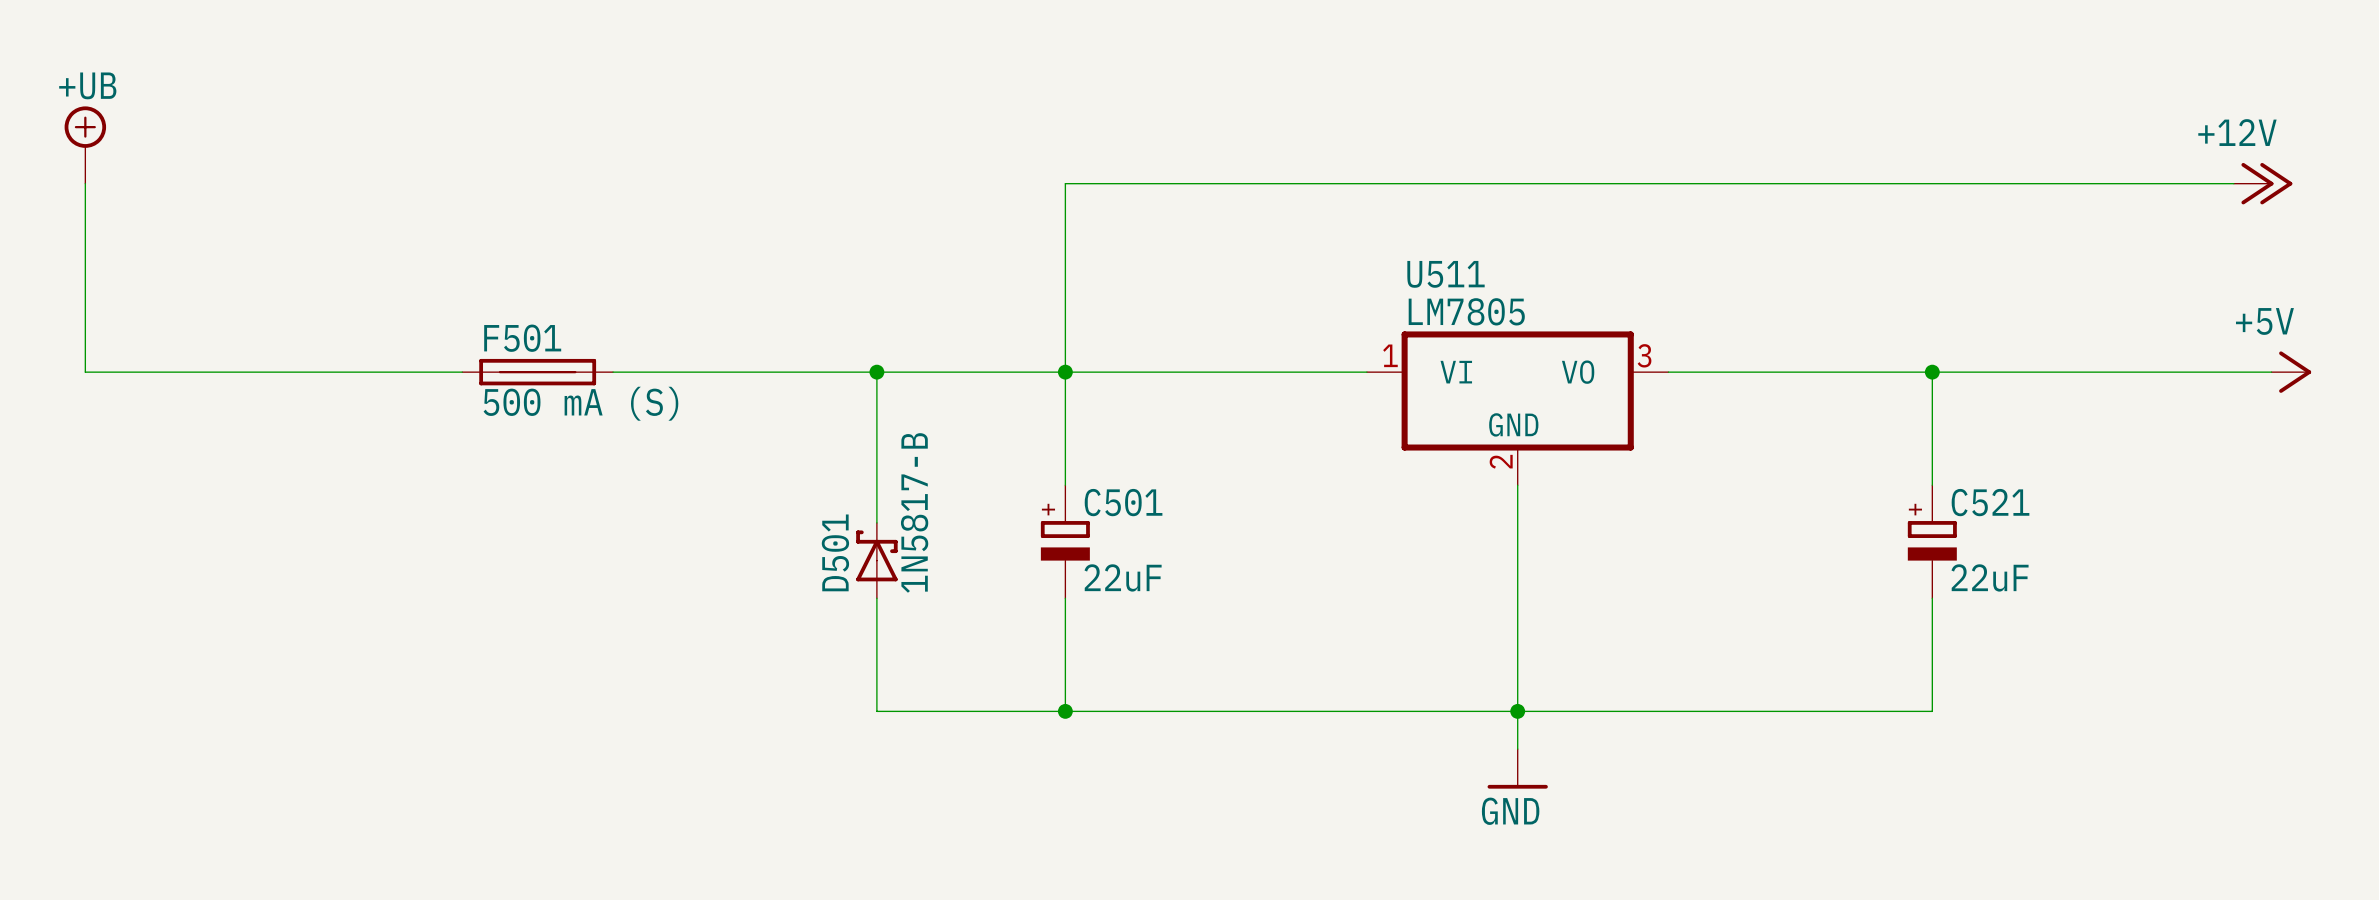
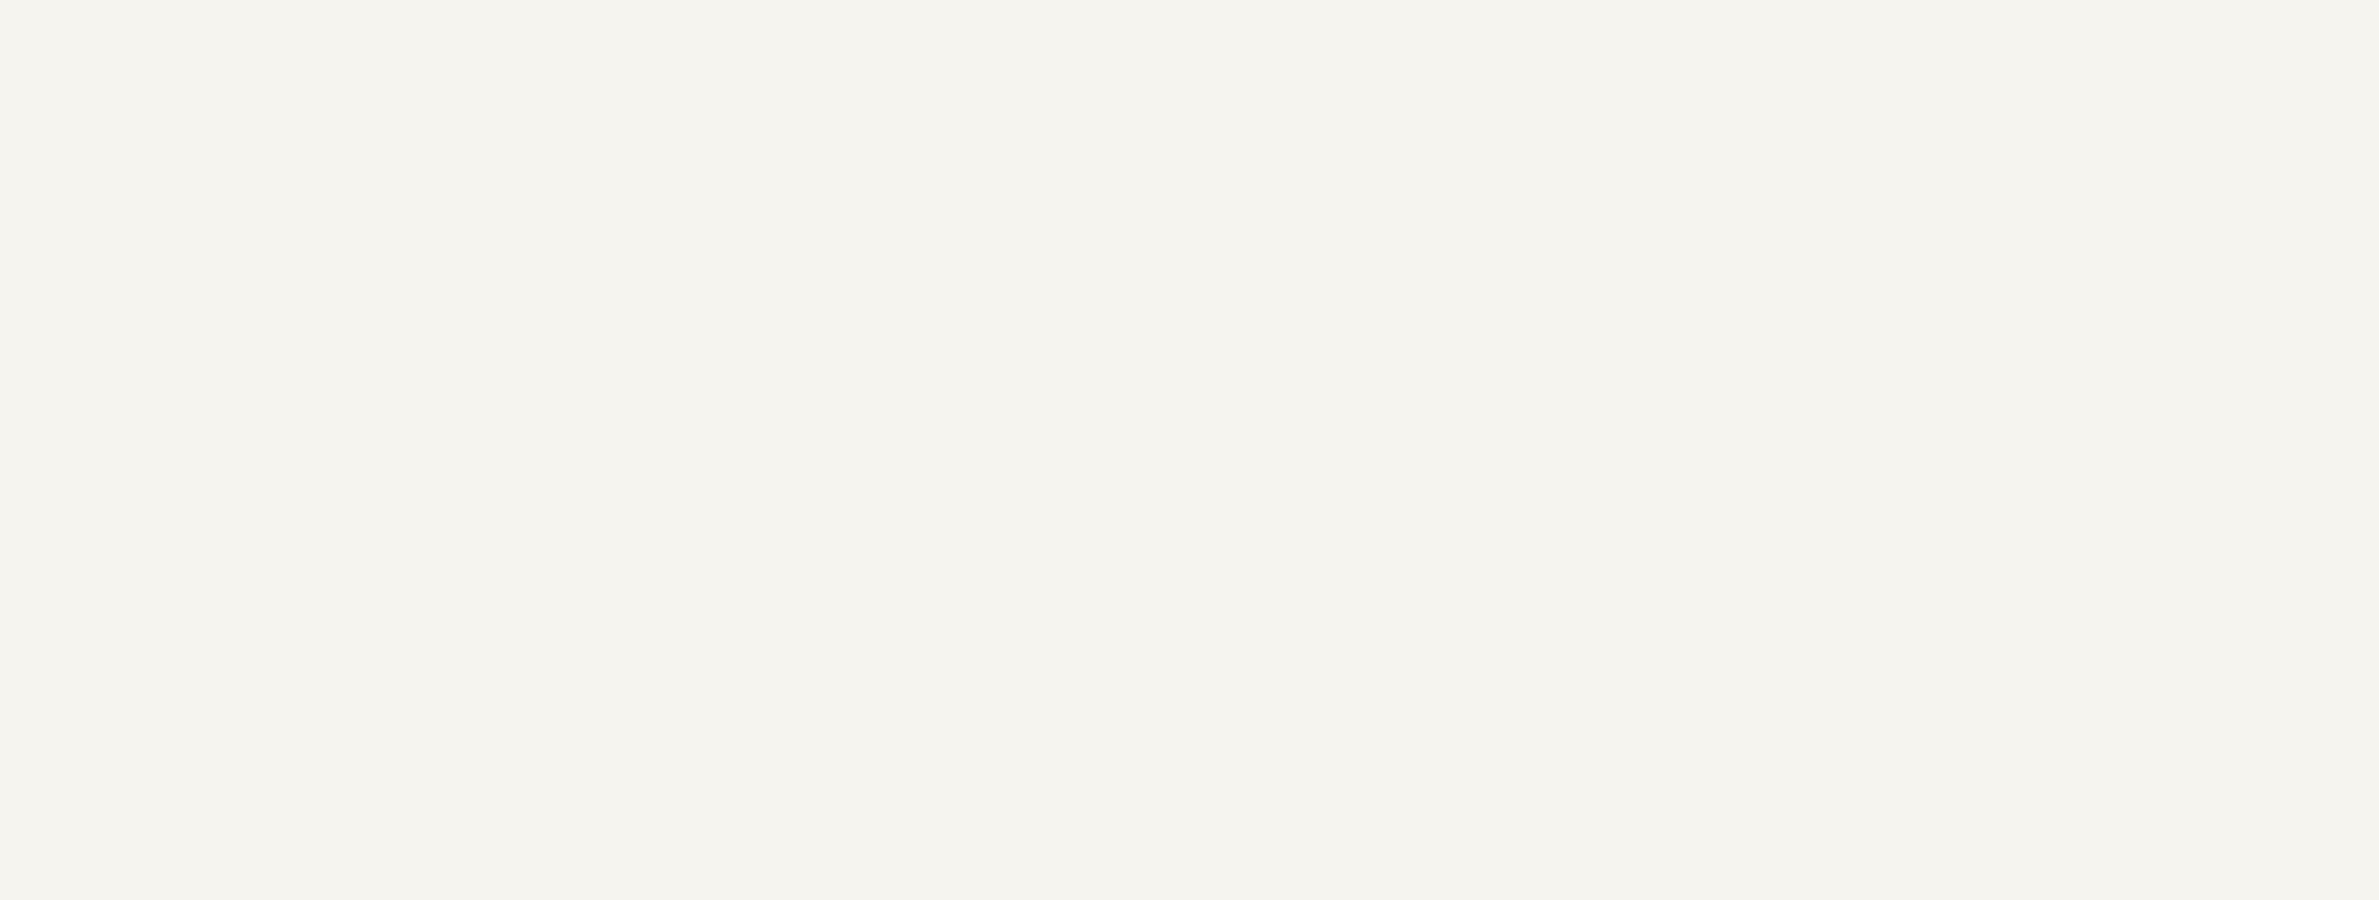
power symbol: +UB (85, 145) -> none
wire: (85, 183) (85, 372) (462, 372) -> none
wire: (2233, 183) (1065, 183) (1065, 485) -> none
power symbol: +12V (2263, 183) -> none
F501: 500 mA (S) (537, 372) -> none
wire: (613, 372) (1366, 372) -> none
wire: (876, 372) (876, 522) -> none
junction: (876, 372) -> none
junction: (1065, 372) -> none
wire: (1668, 372) (2271, 372) -> none
wire: (1932, 372) (1932, 485) -> none
junction: (1932, 372) -> none
power symbol: +5V (2291, 372) -> none
U511: LM7805 (1517, 408) -> none
wire: (1517, 485) (1517, 749) -> none
C501: 22uF (1065, 541) -> none
C521: 22uF (1932, 541) -> none
D501: 1N5817-B (876, 560) -> none
wire: (876, 598) (876, 711) (1932, 711) (1932, 598) -> none
wire: (1065, 598) (1065, 711) -> none
junction: (1065, 711) -> none
junction: (1517, 711) -> none
power symbol: GND (1517, 768) -> none

